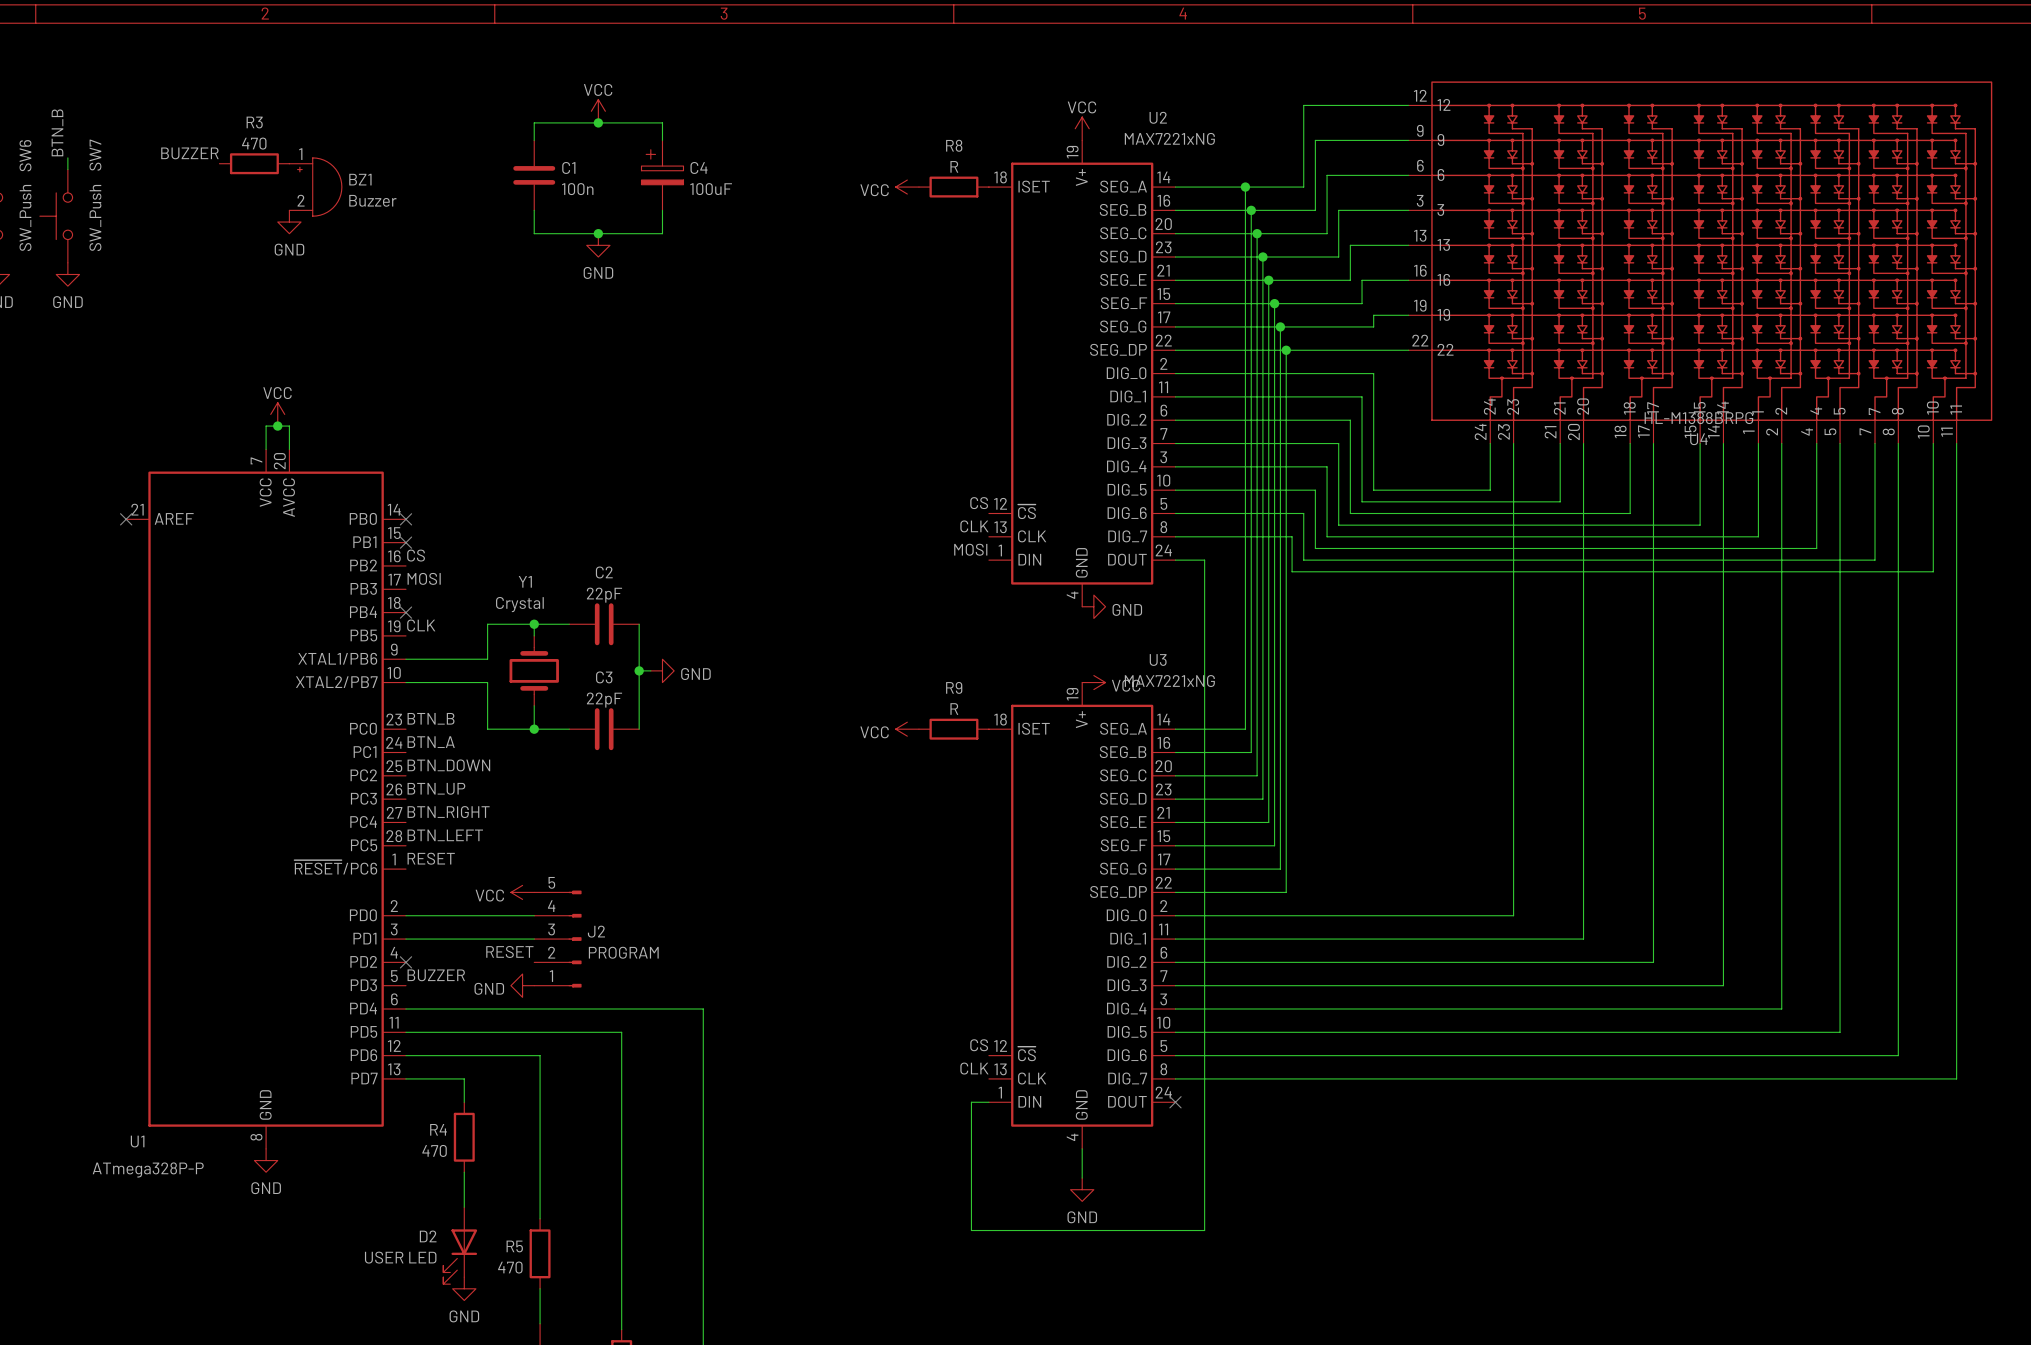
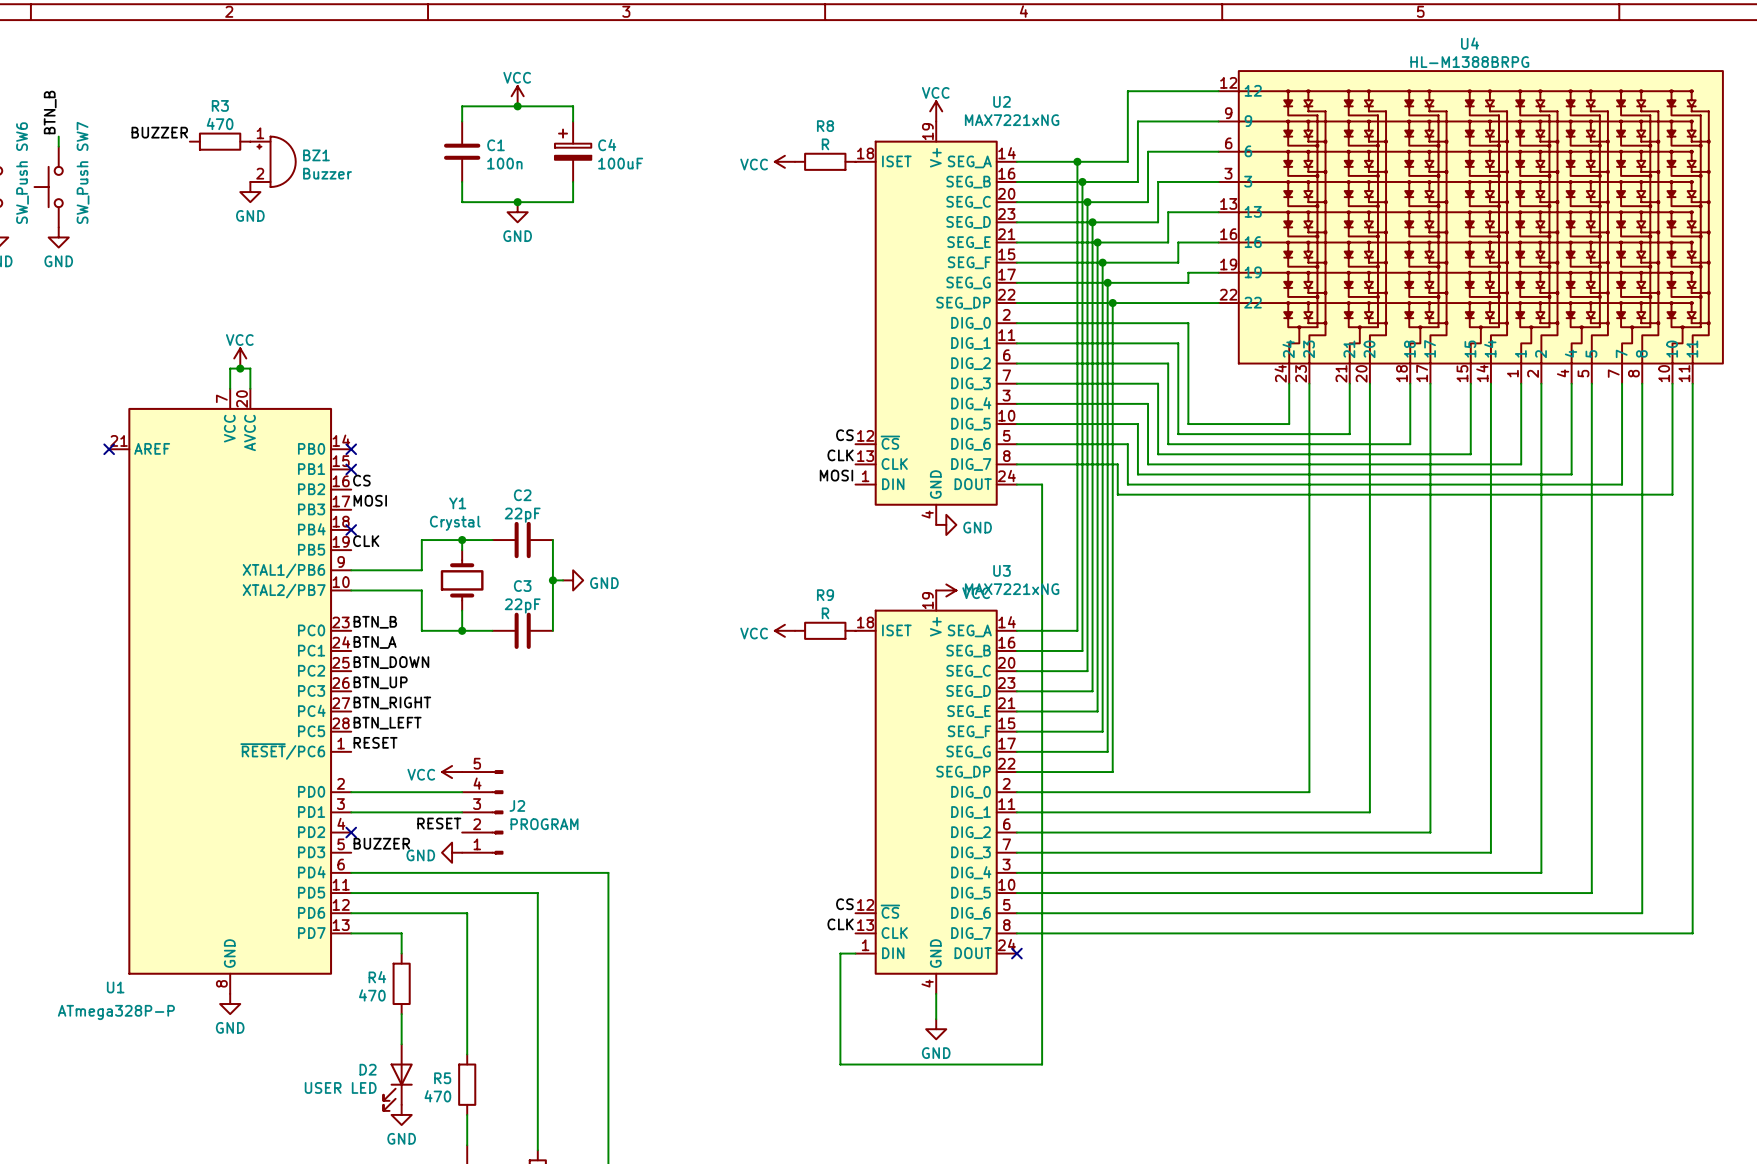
U4 value position: HL-M1388BRPG (1698, 418) -> HL-M1388BRPG (1469, 62)
U4 name position: U4 (1698, 439) -> U4 (1470, 43)

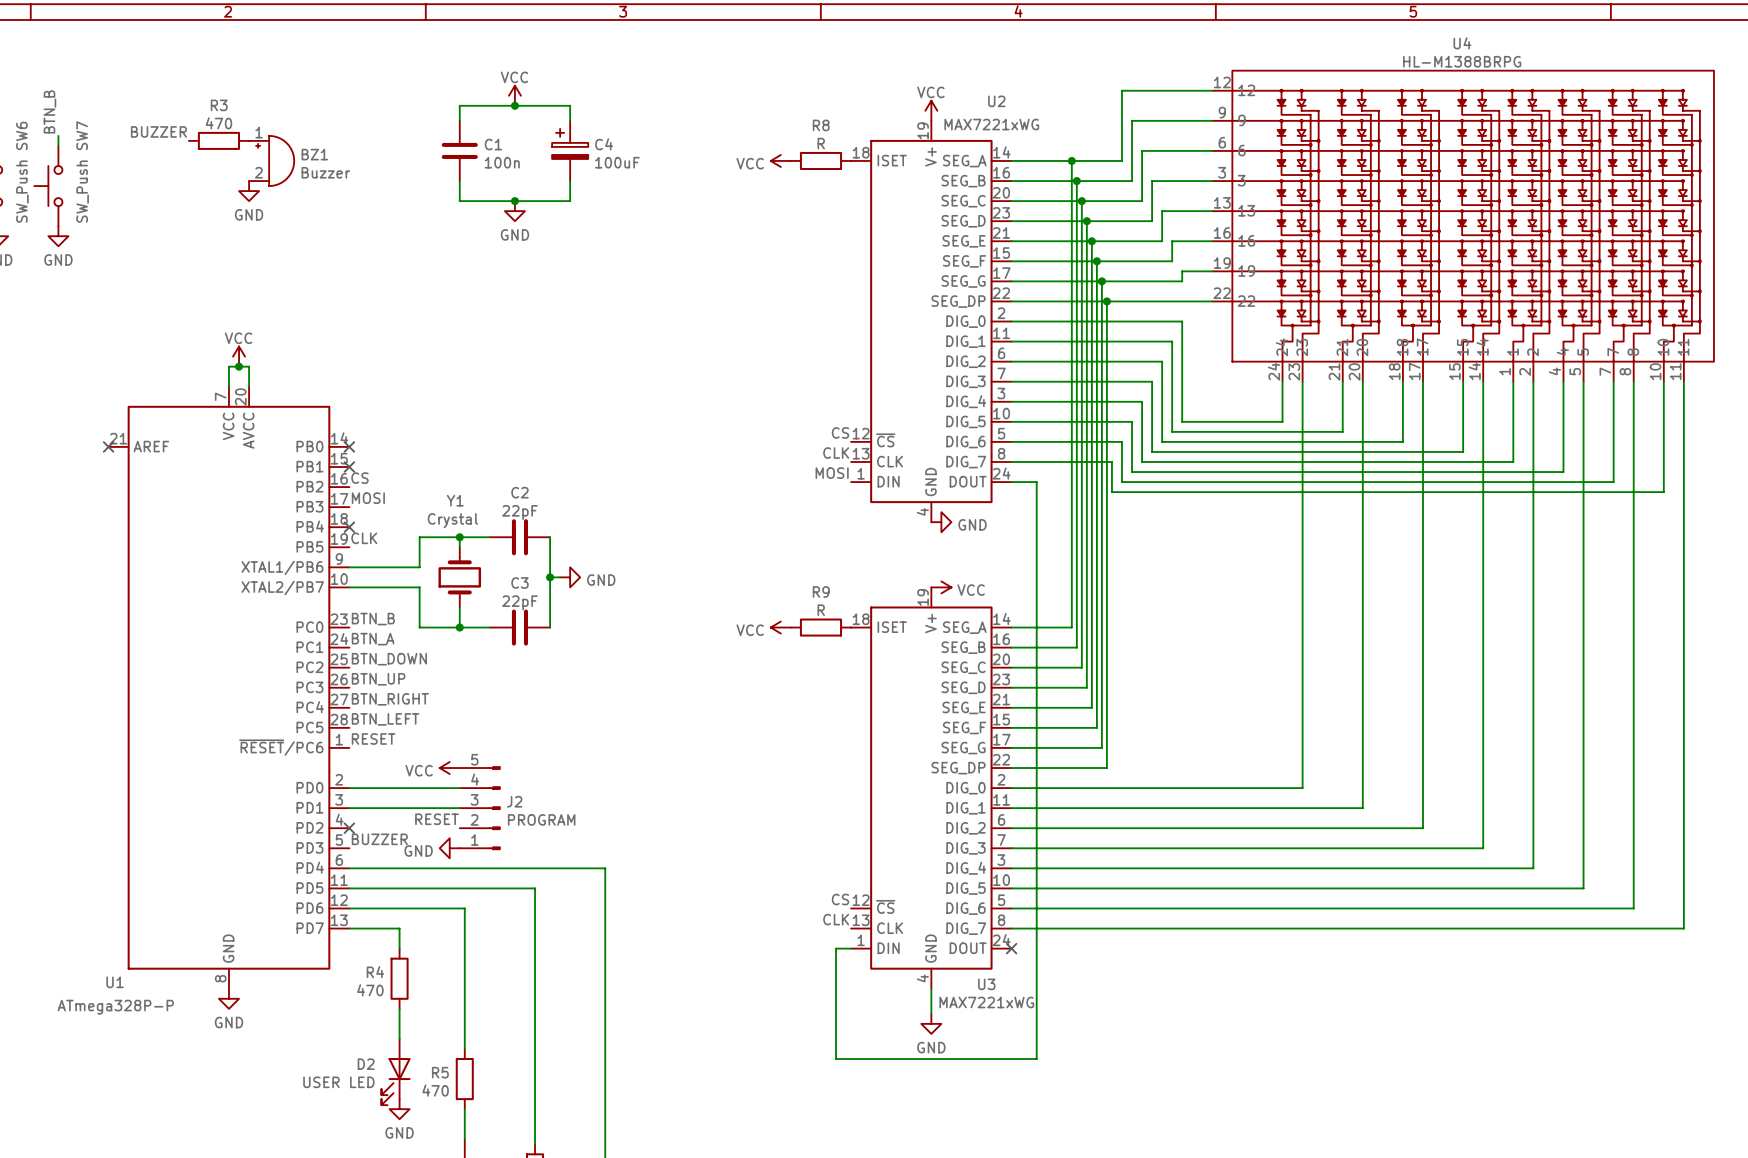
U2 value: MAX7221xNG (1012, 120) -> MAX7221xWG (991, 124)
U3 name position: U3 (1002, 570) -> U3 (986, 984)
U3 value: MAX7221xNG (1012, 589) -> MAX7221xWG (986, 1002)

